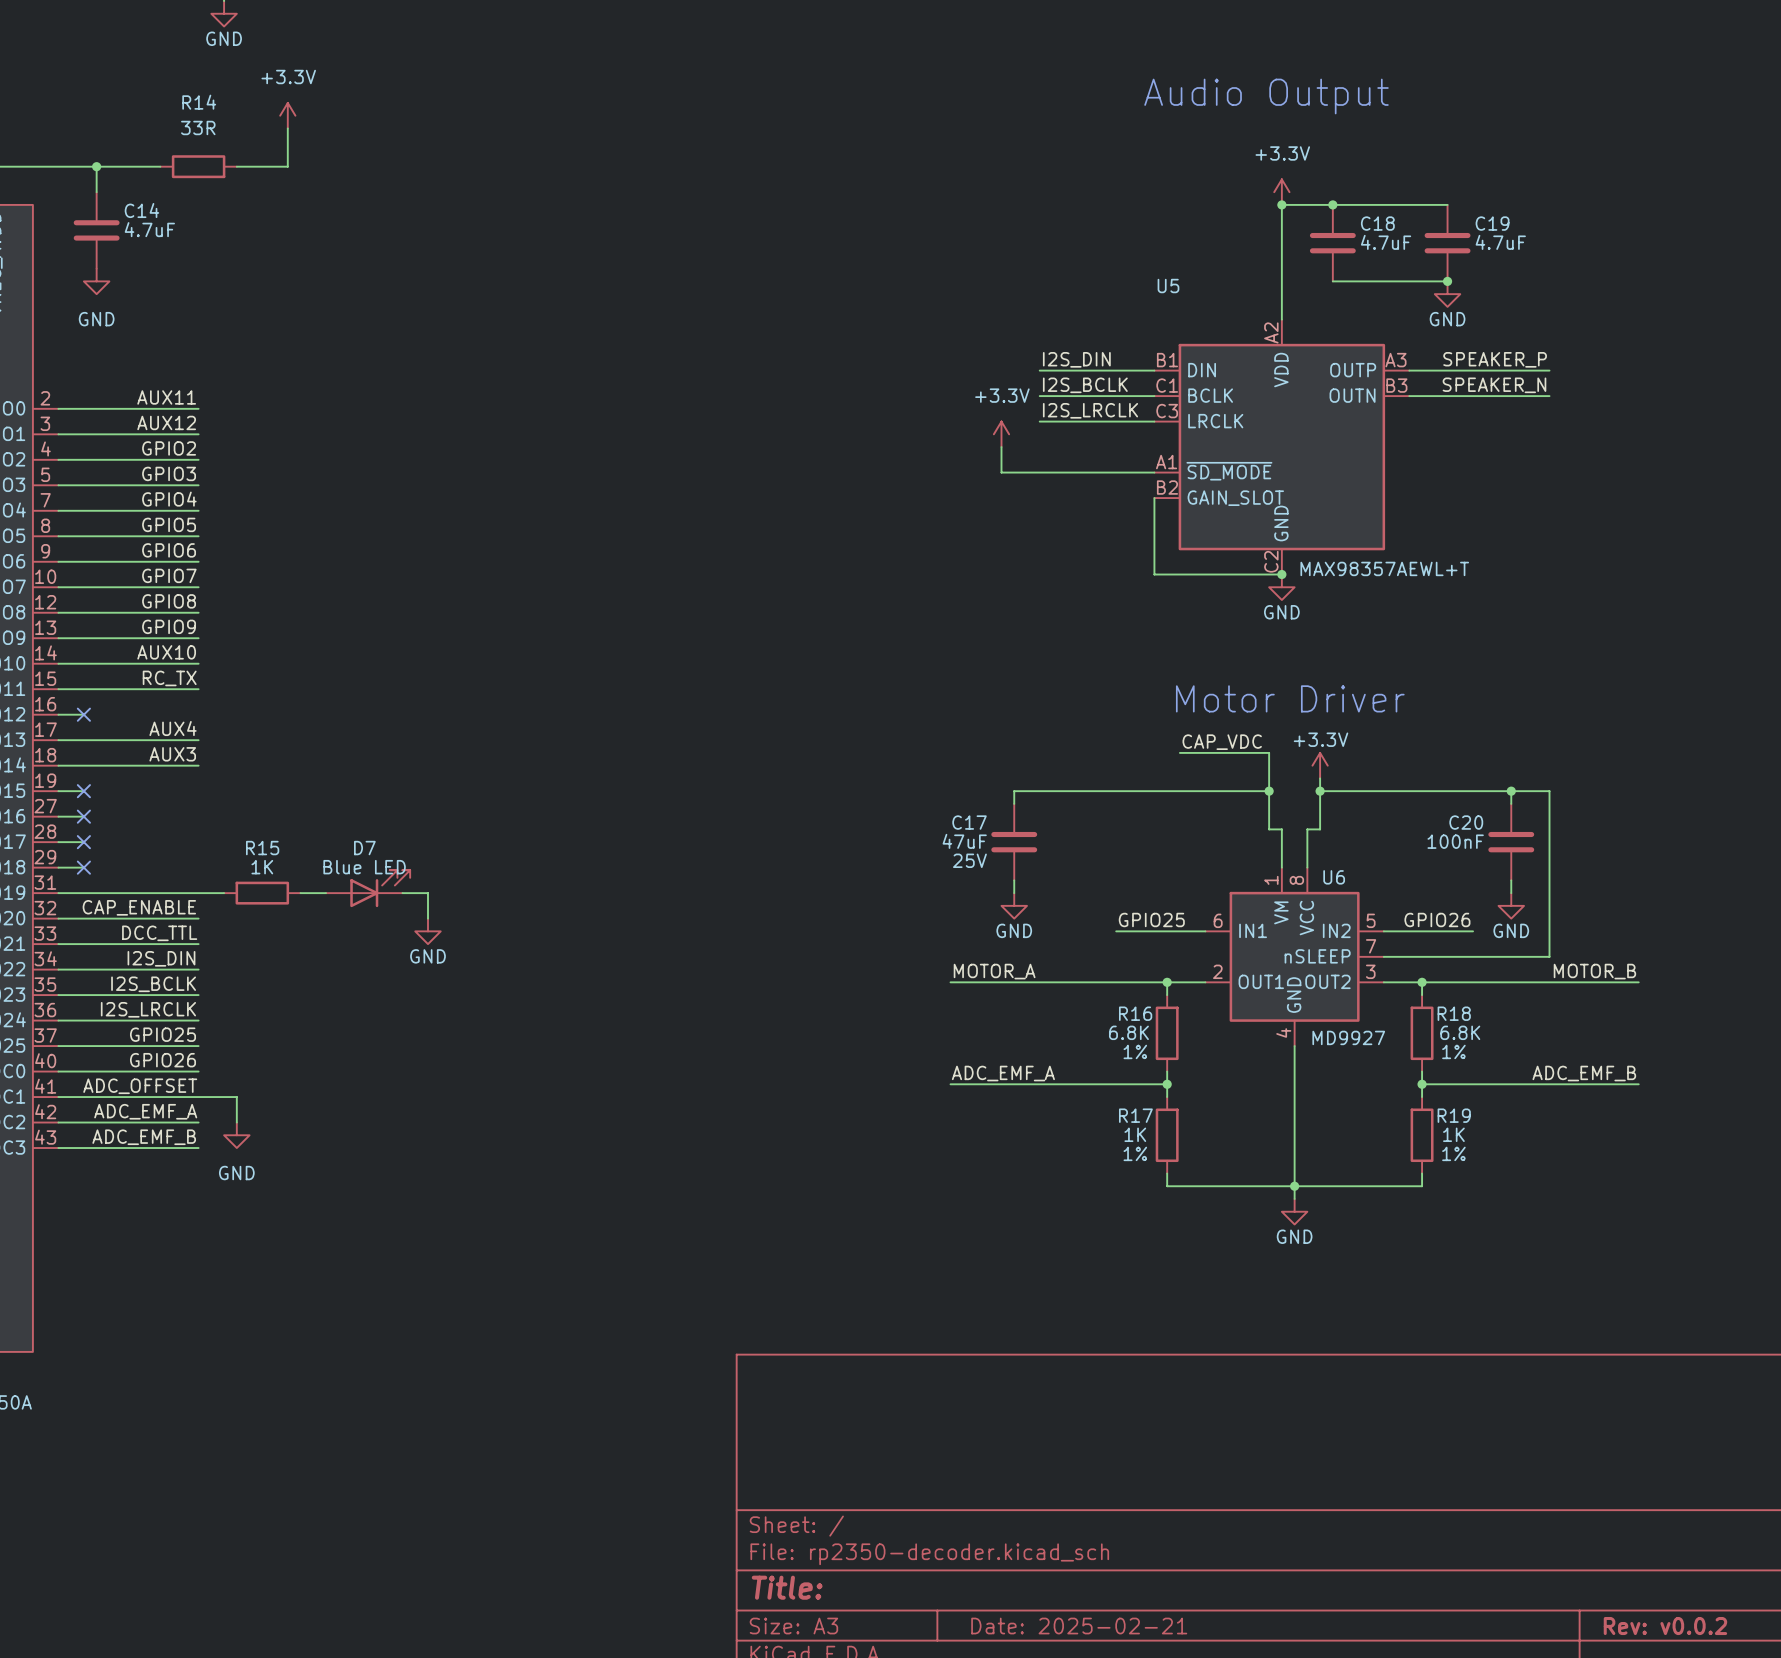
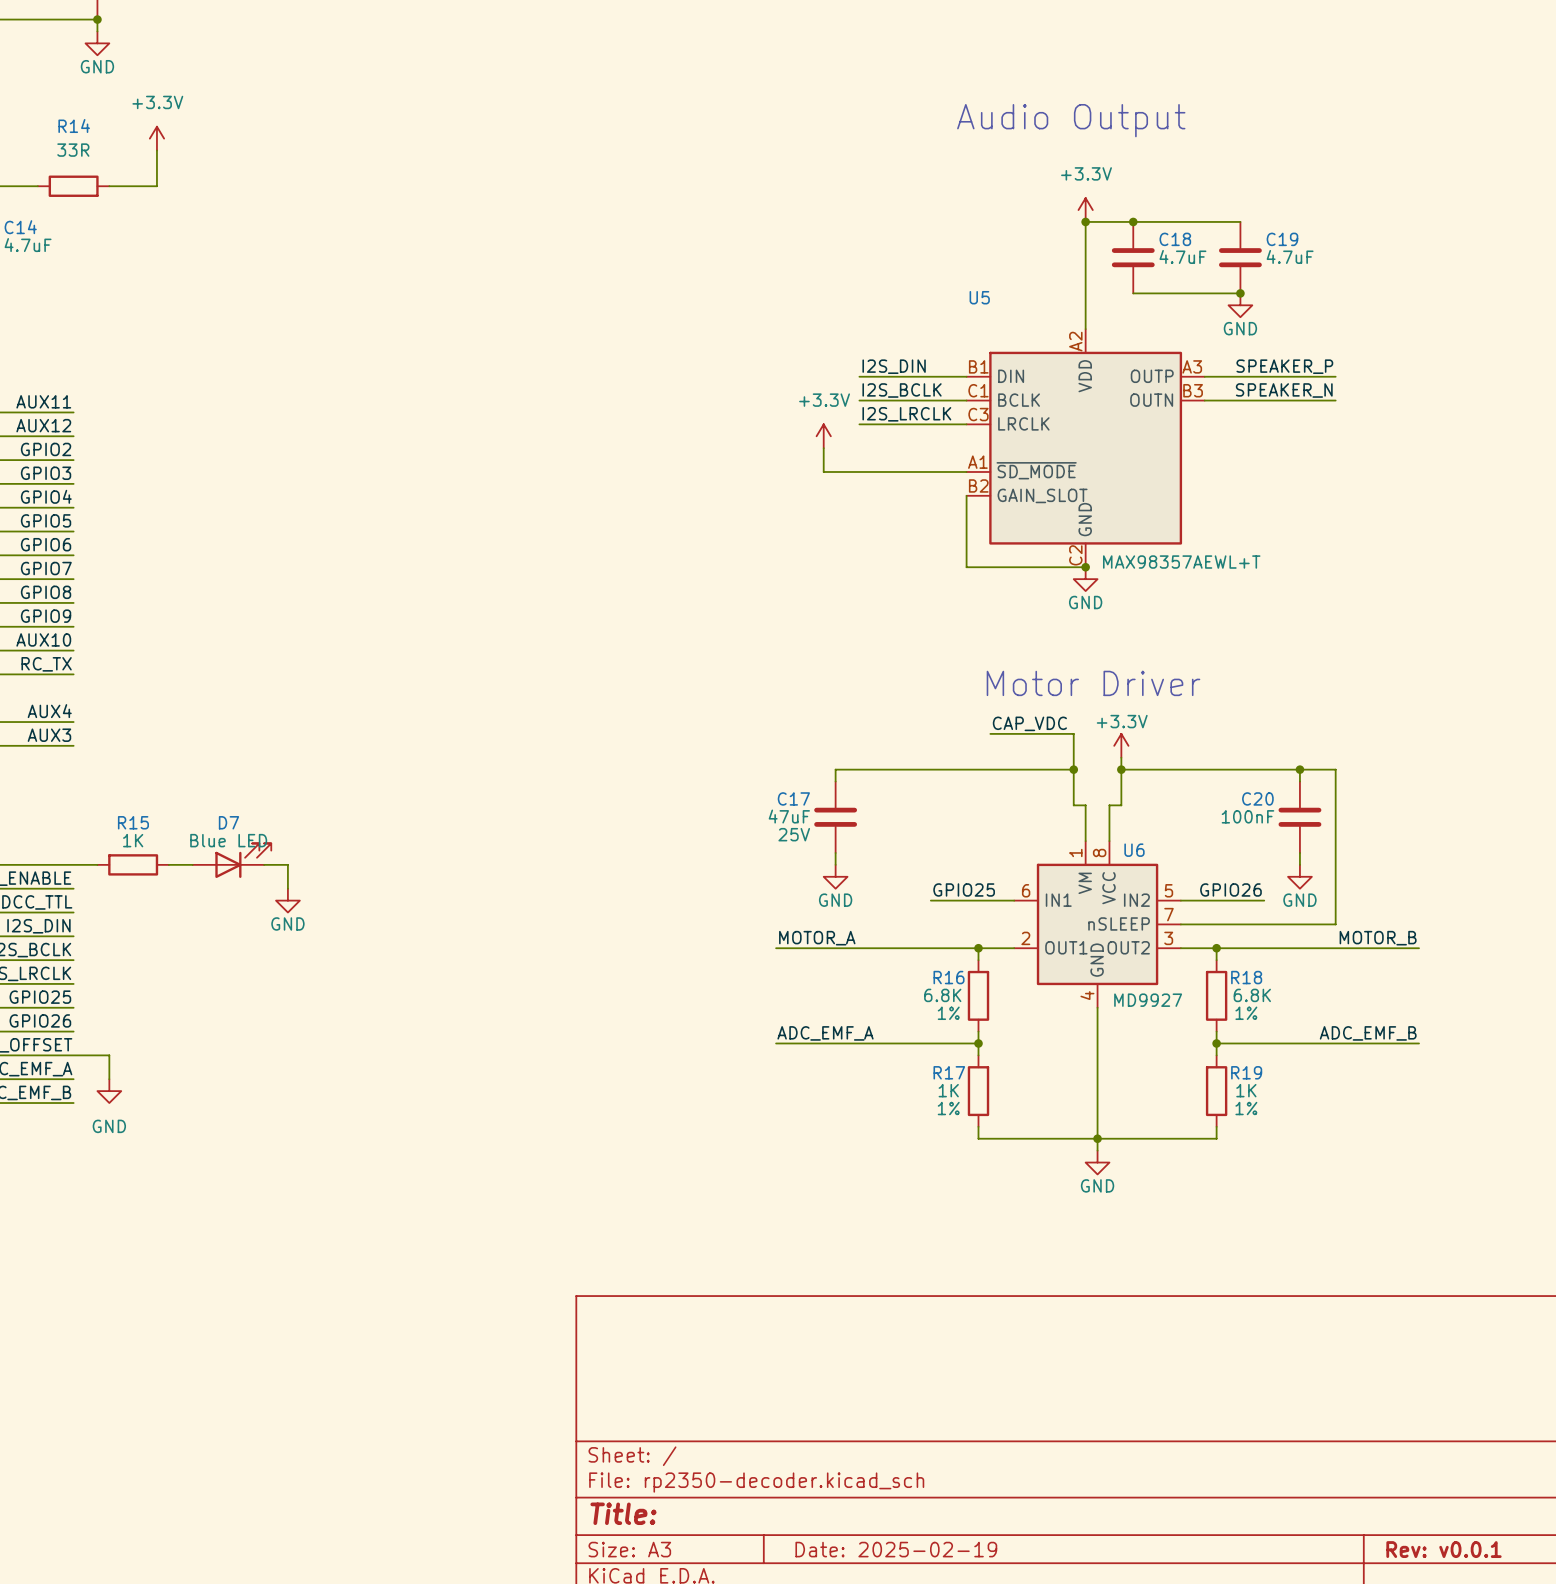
title block: Date: 2025-02-21 (1079, 1626) -> Date: 2025-02-19 (896, 1549)
title block: Rev: v0.0.2 (1665, 1626) -> Rev: v0.0.1 (1443, 1549)

